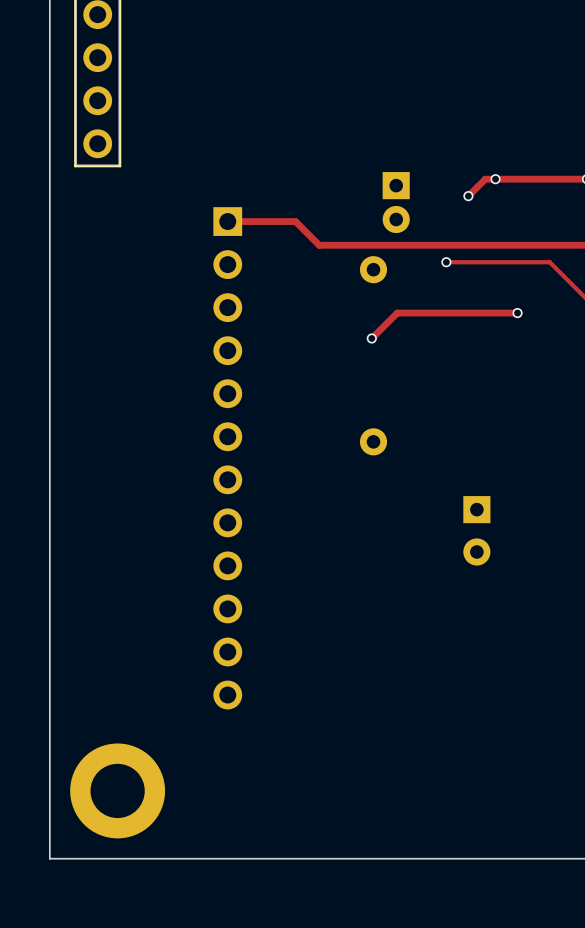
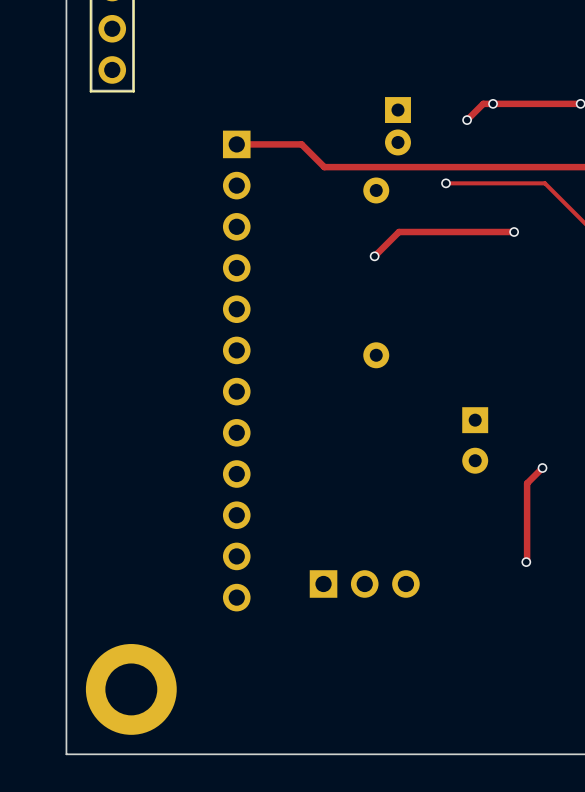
track: none -> (542, 468) (527, 483) (526, 562)
via: none -> (542, 468)
via: none -> (526, 562)
part: none -> (364, 583)

